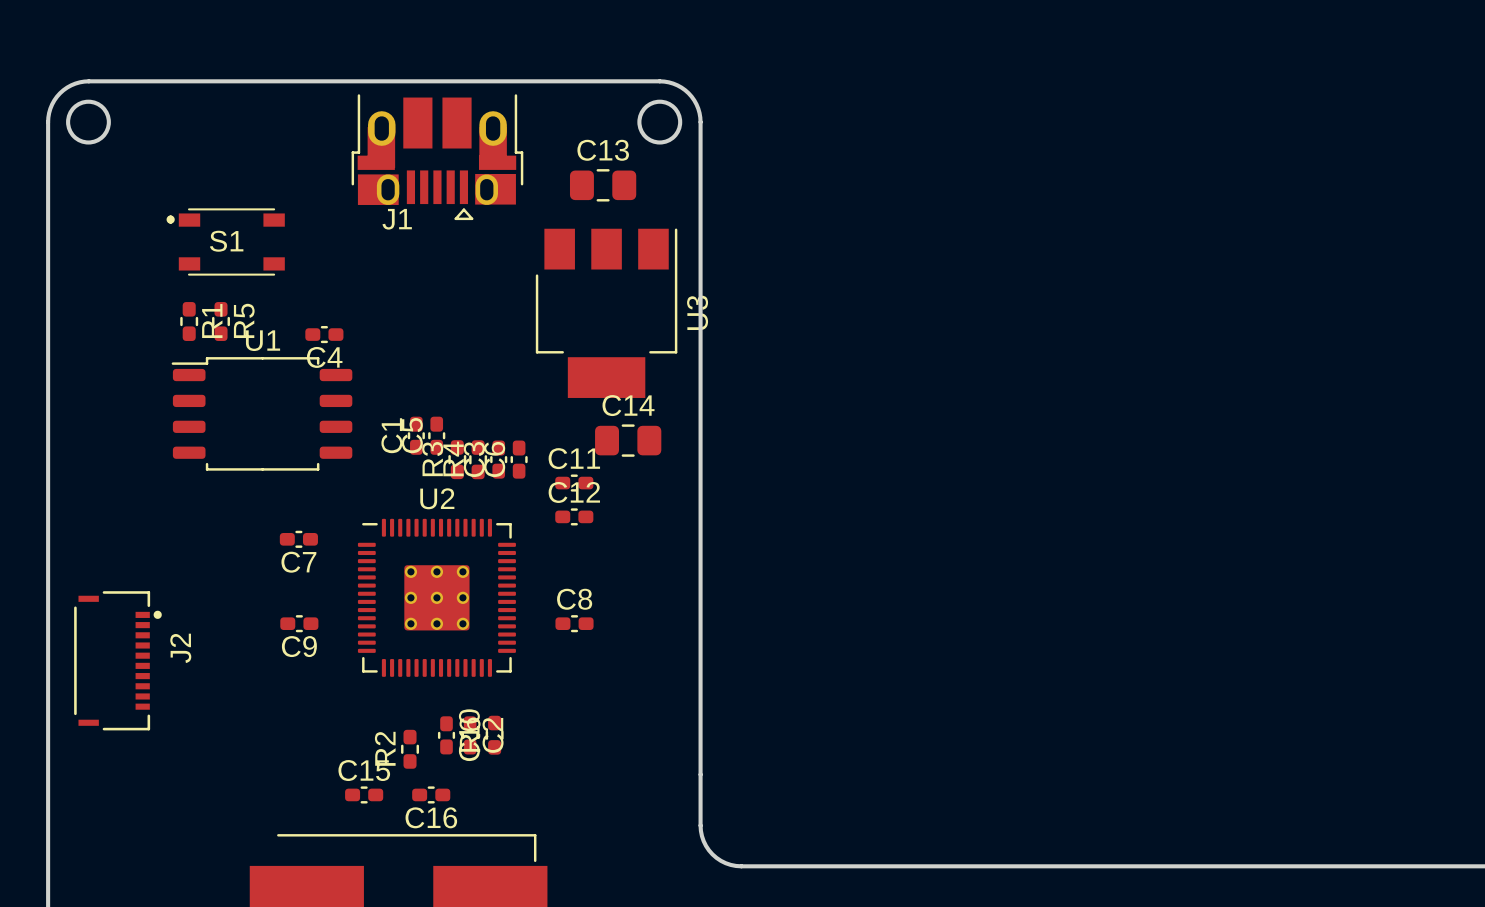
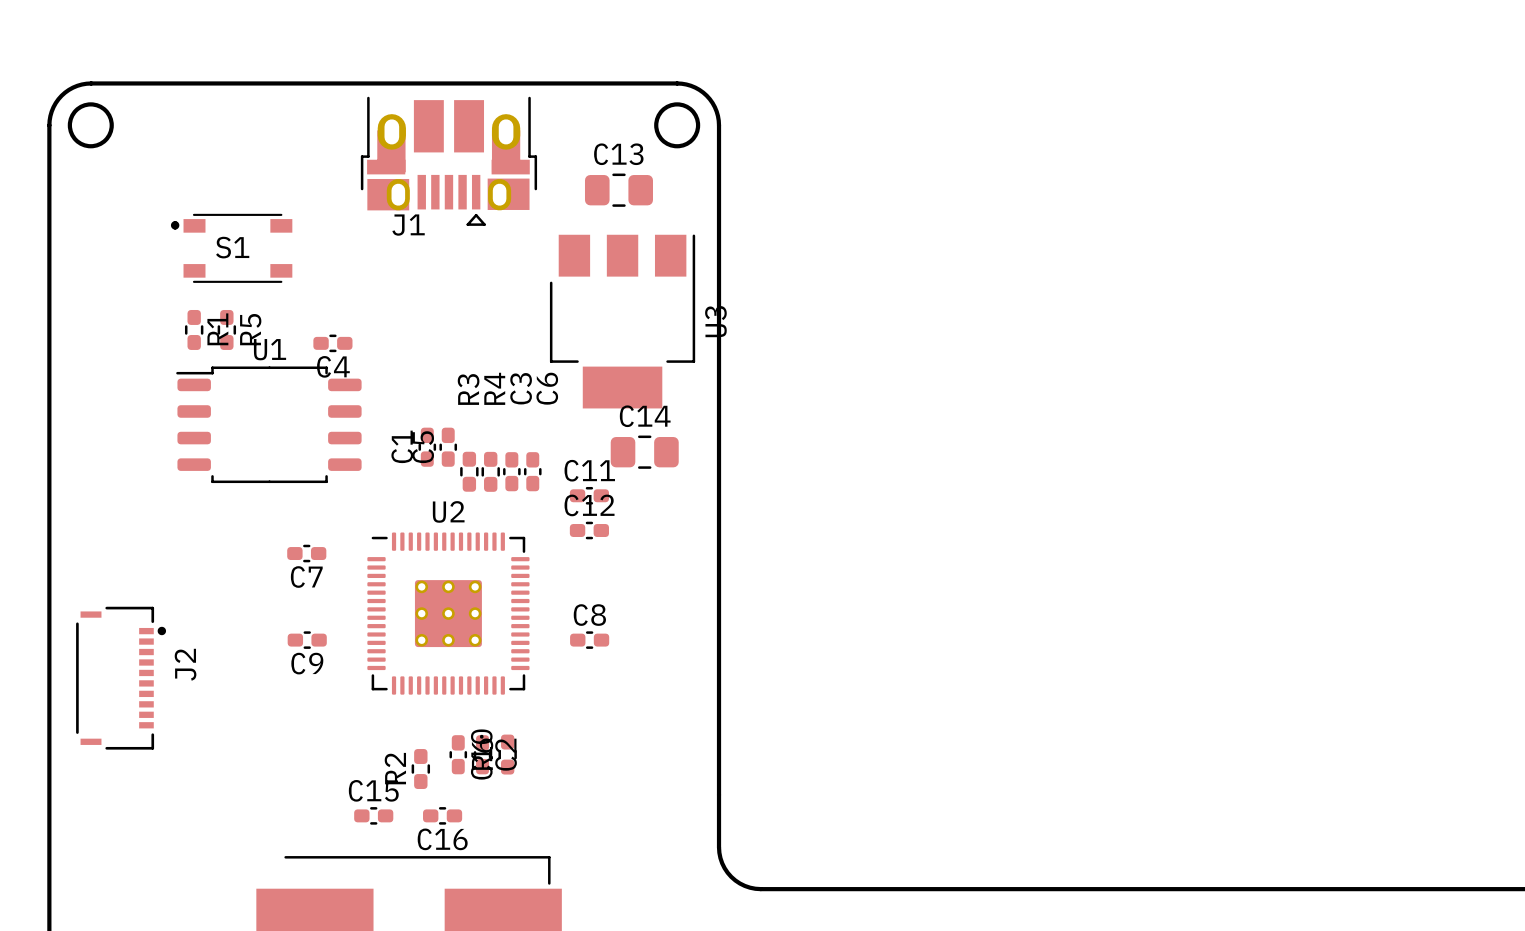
R4 name position: R4 (453, 458) -> R4 (494, 388)
R3 name position: R3 (432, 459) -> R3 (468, 389)
C3 name position: C3 (474, 459) -> C3 (521, 388)
C6 name position: C6 (494, 459) -> C6 (547, 388)

